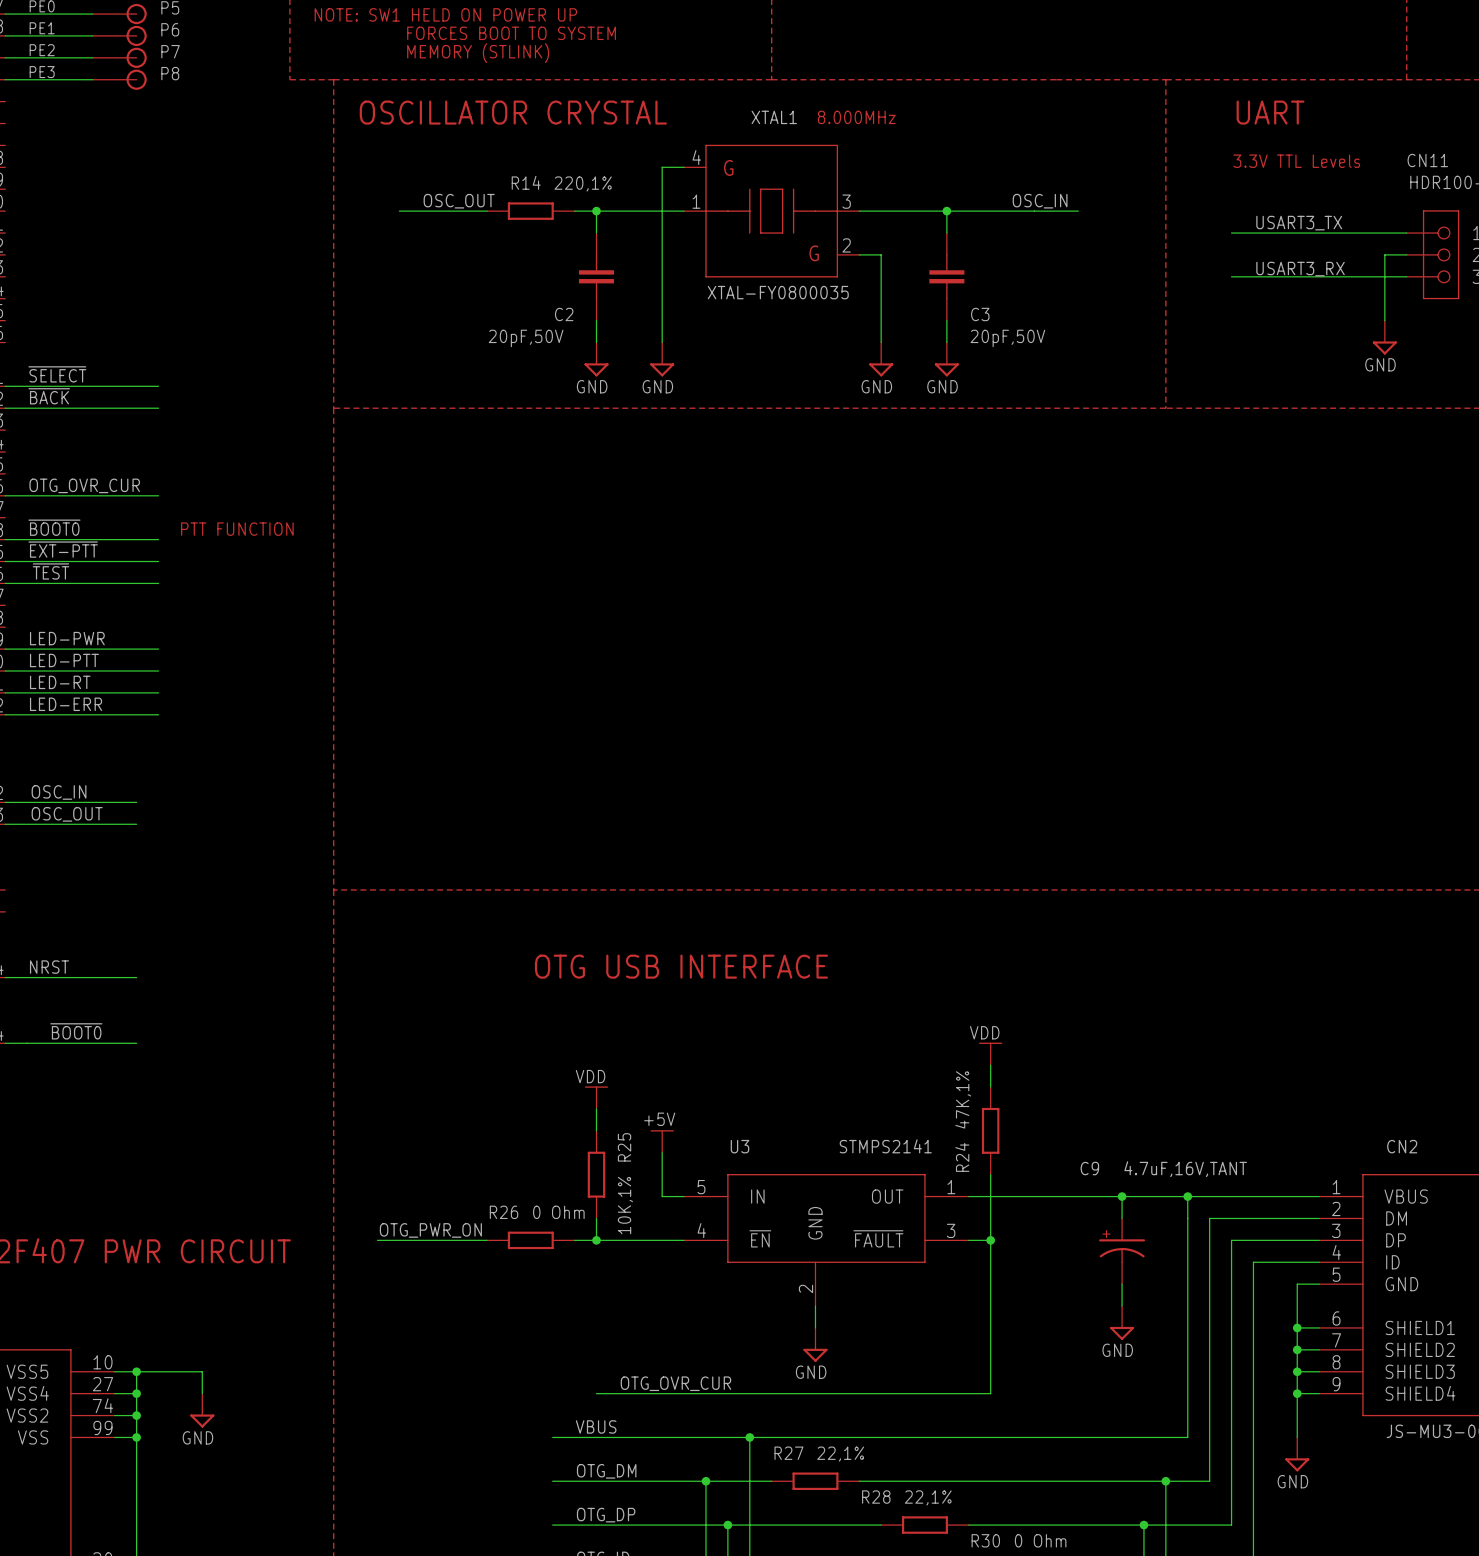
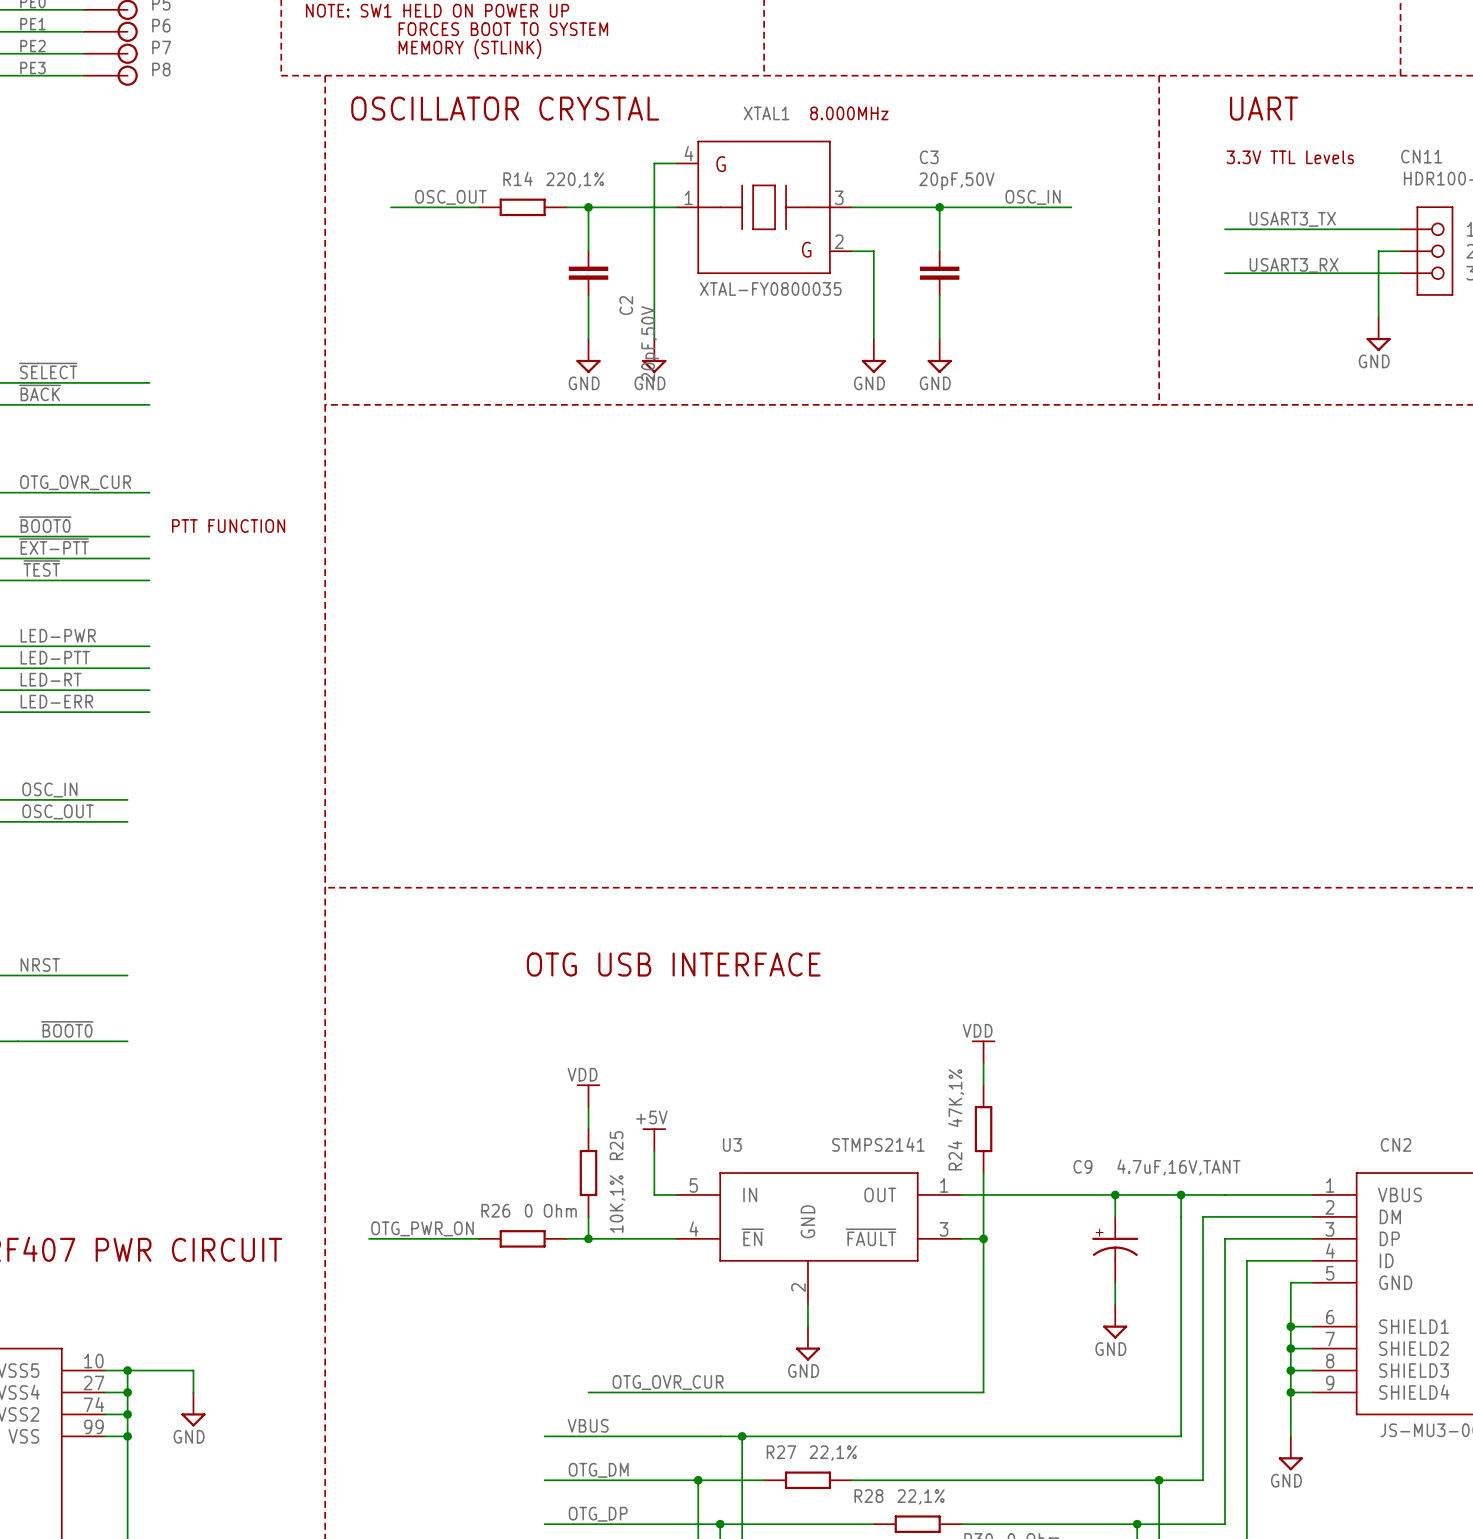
C2 symbol: [578, 233, 615, 321] -> [568, 250, 609, 296]
C3 symbol: [929, 233, 965, 321] -> [919, 250, 960, 296]
C2 name position: C2 (564, 314) -> C2 (626, 305)
C3 name position: C3 (980, 314) -> C3 (929, 157)
C2 value position: 20pF,50V (526, 338) -> 20pF,50V (650, 343)
C3 value position: 20pF,50V (1007, 338) -> 20pF,50V (956, 181)

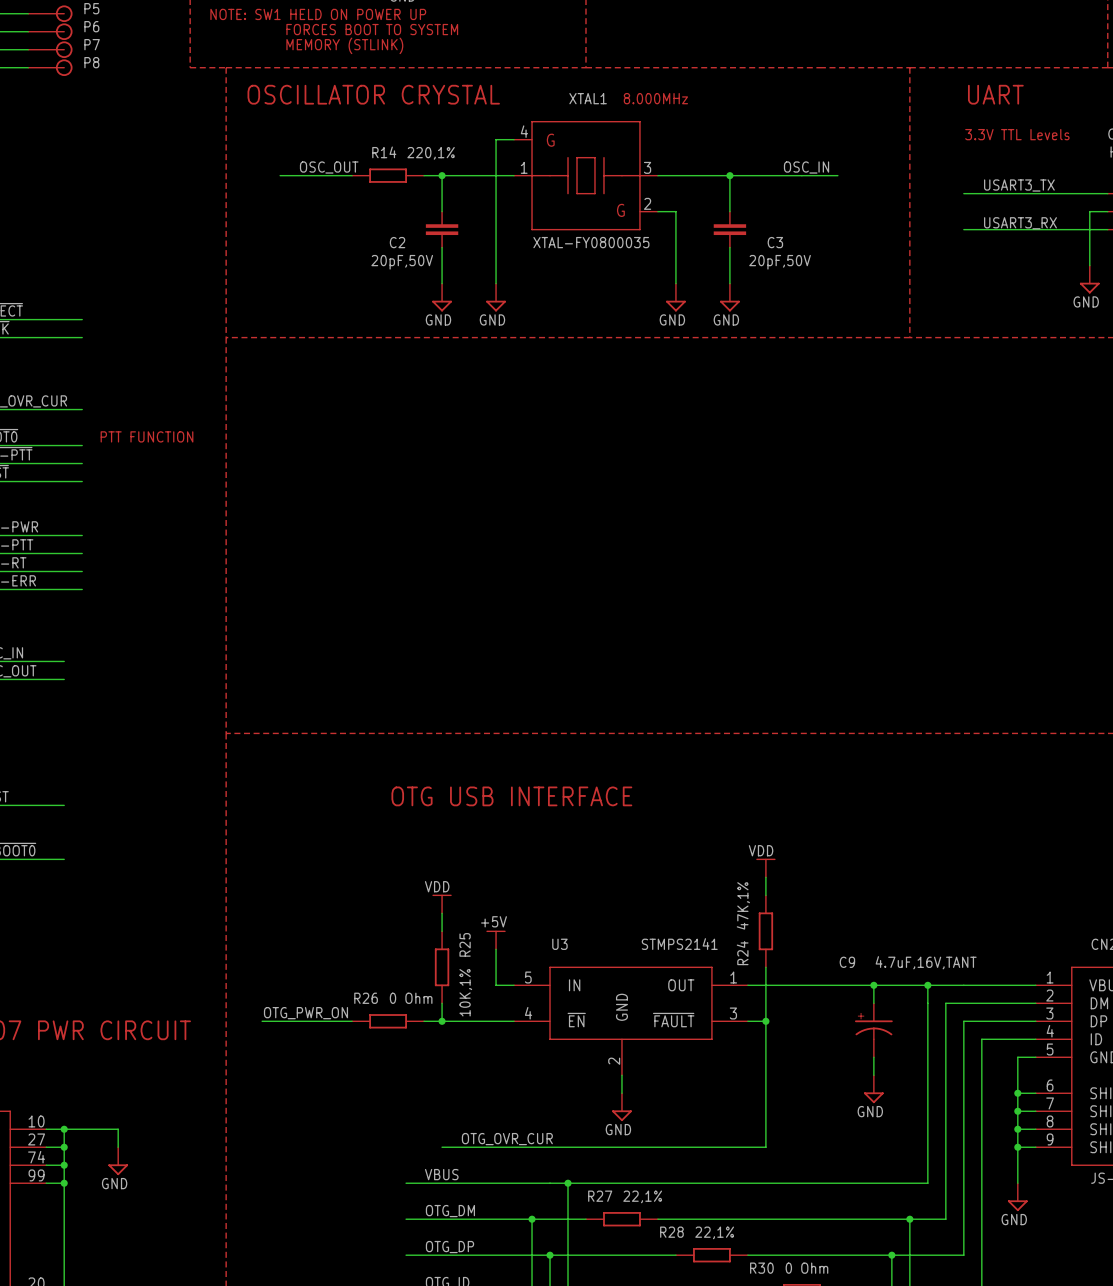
C3 name position: C3 (929, 157) -> C3 (775, 242)
C3 value position: 20pF,50V (956, 181) -> 20pF,50V (780, 262)
C2 name rotation: 0° (626, 305) -> 90° clockwise (397, 242)
C2 name position: C2 (626, 305) -> C2 (397, 242)
C2 value rotation: 0° (650, 343) -> 90° clockwise (402, 262)
C2 value position: 20pF,50V (650, 343) -> 20pF,50V (402, 262)

